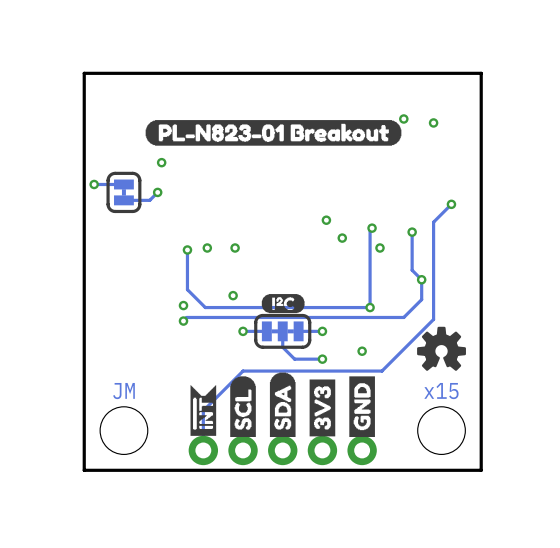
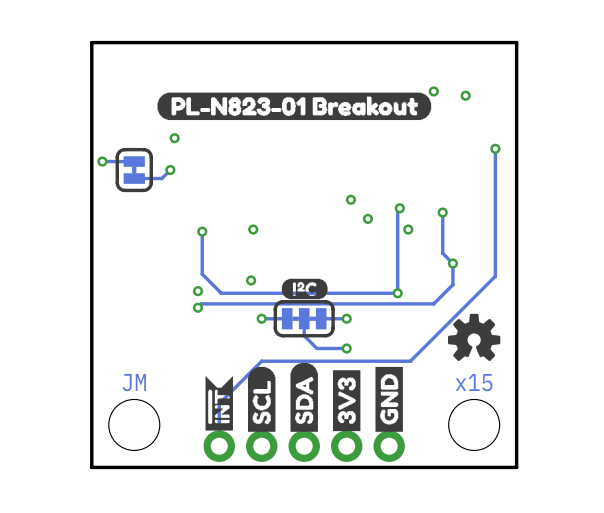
track: (451, 204) (433, 222) (433, 319) -> (495, 148) (495, 276) (465, 305)
via position: (451, 204) -> (495, 148)
via: (207, 248) -> none
via: (362, 351) -> none

